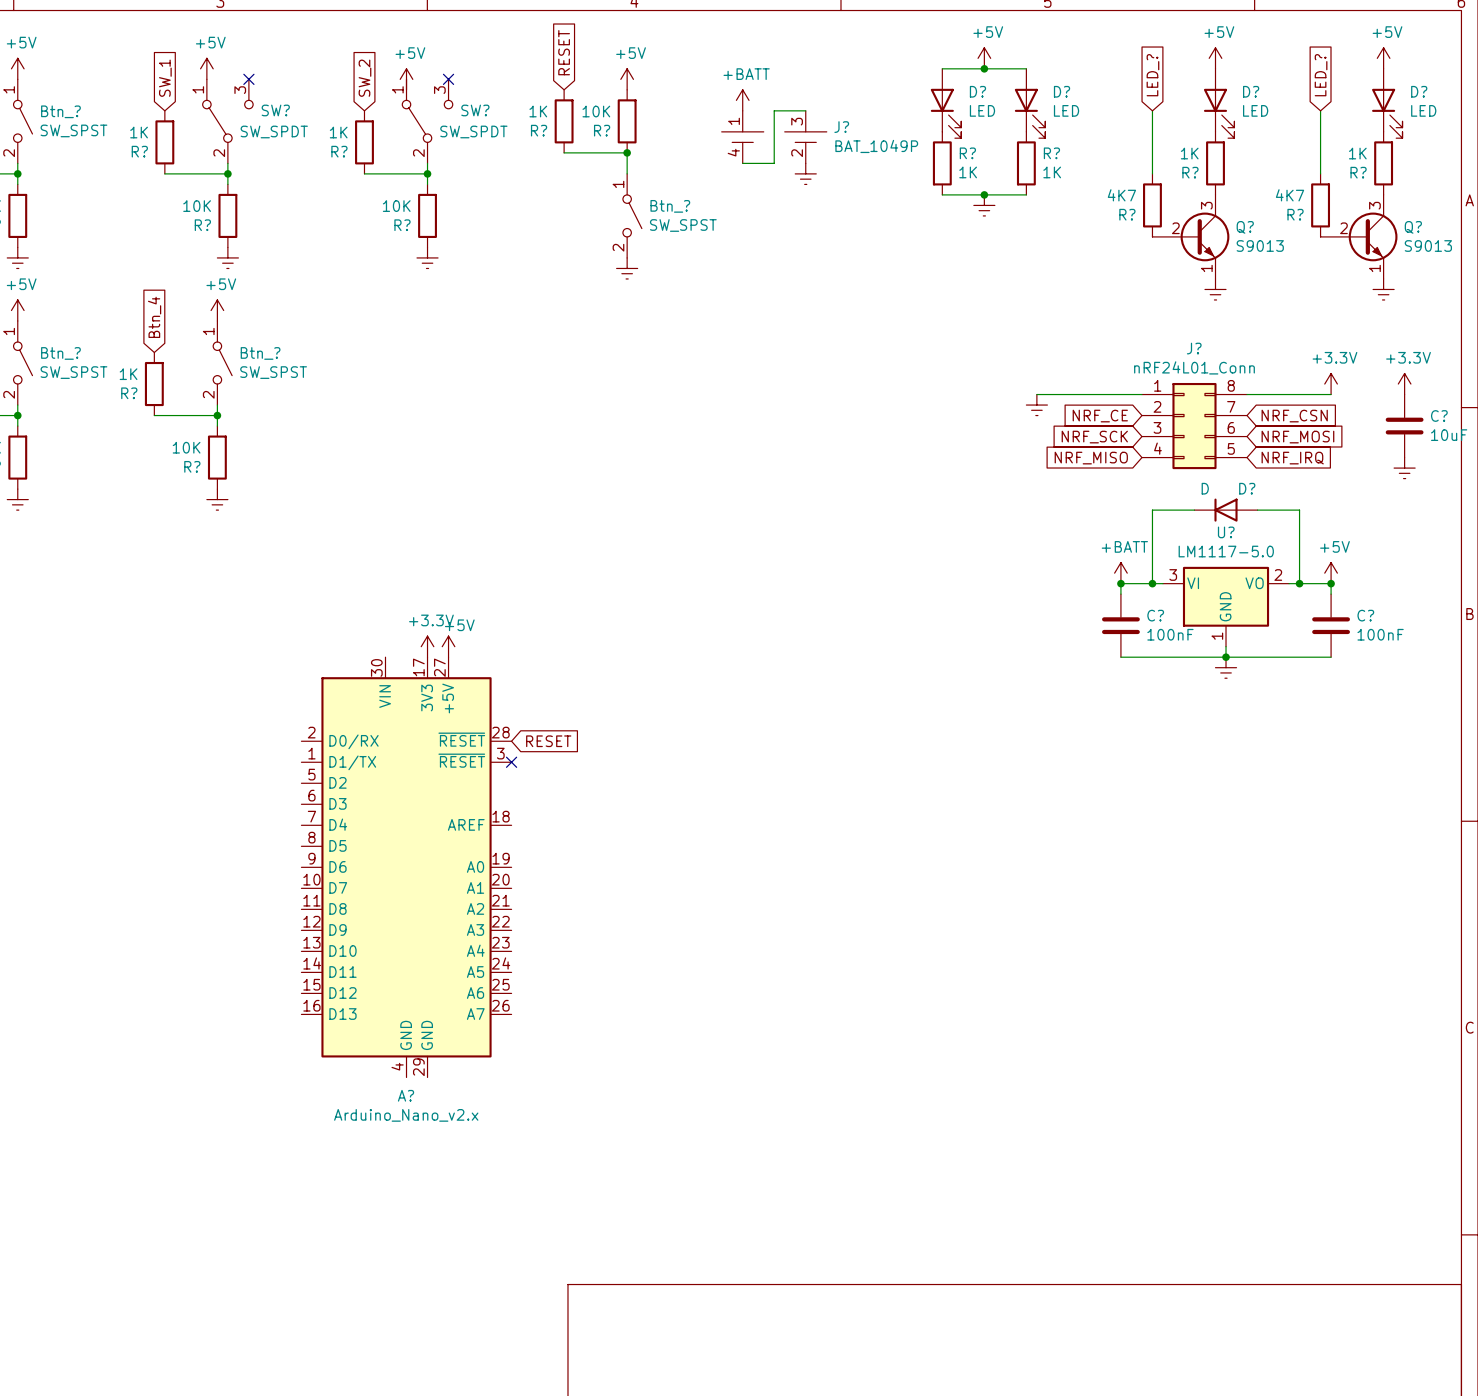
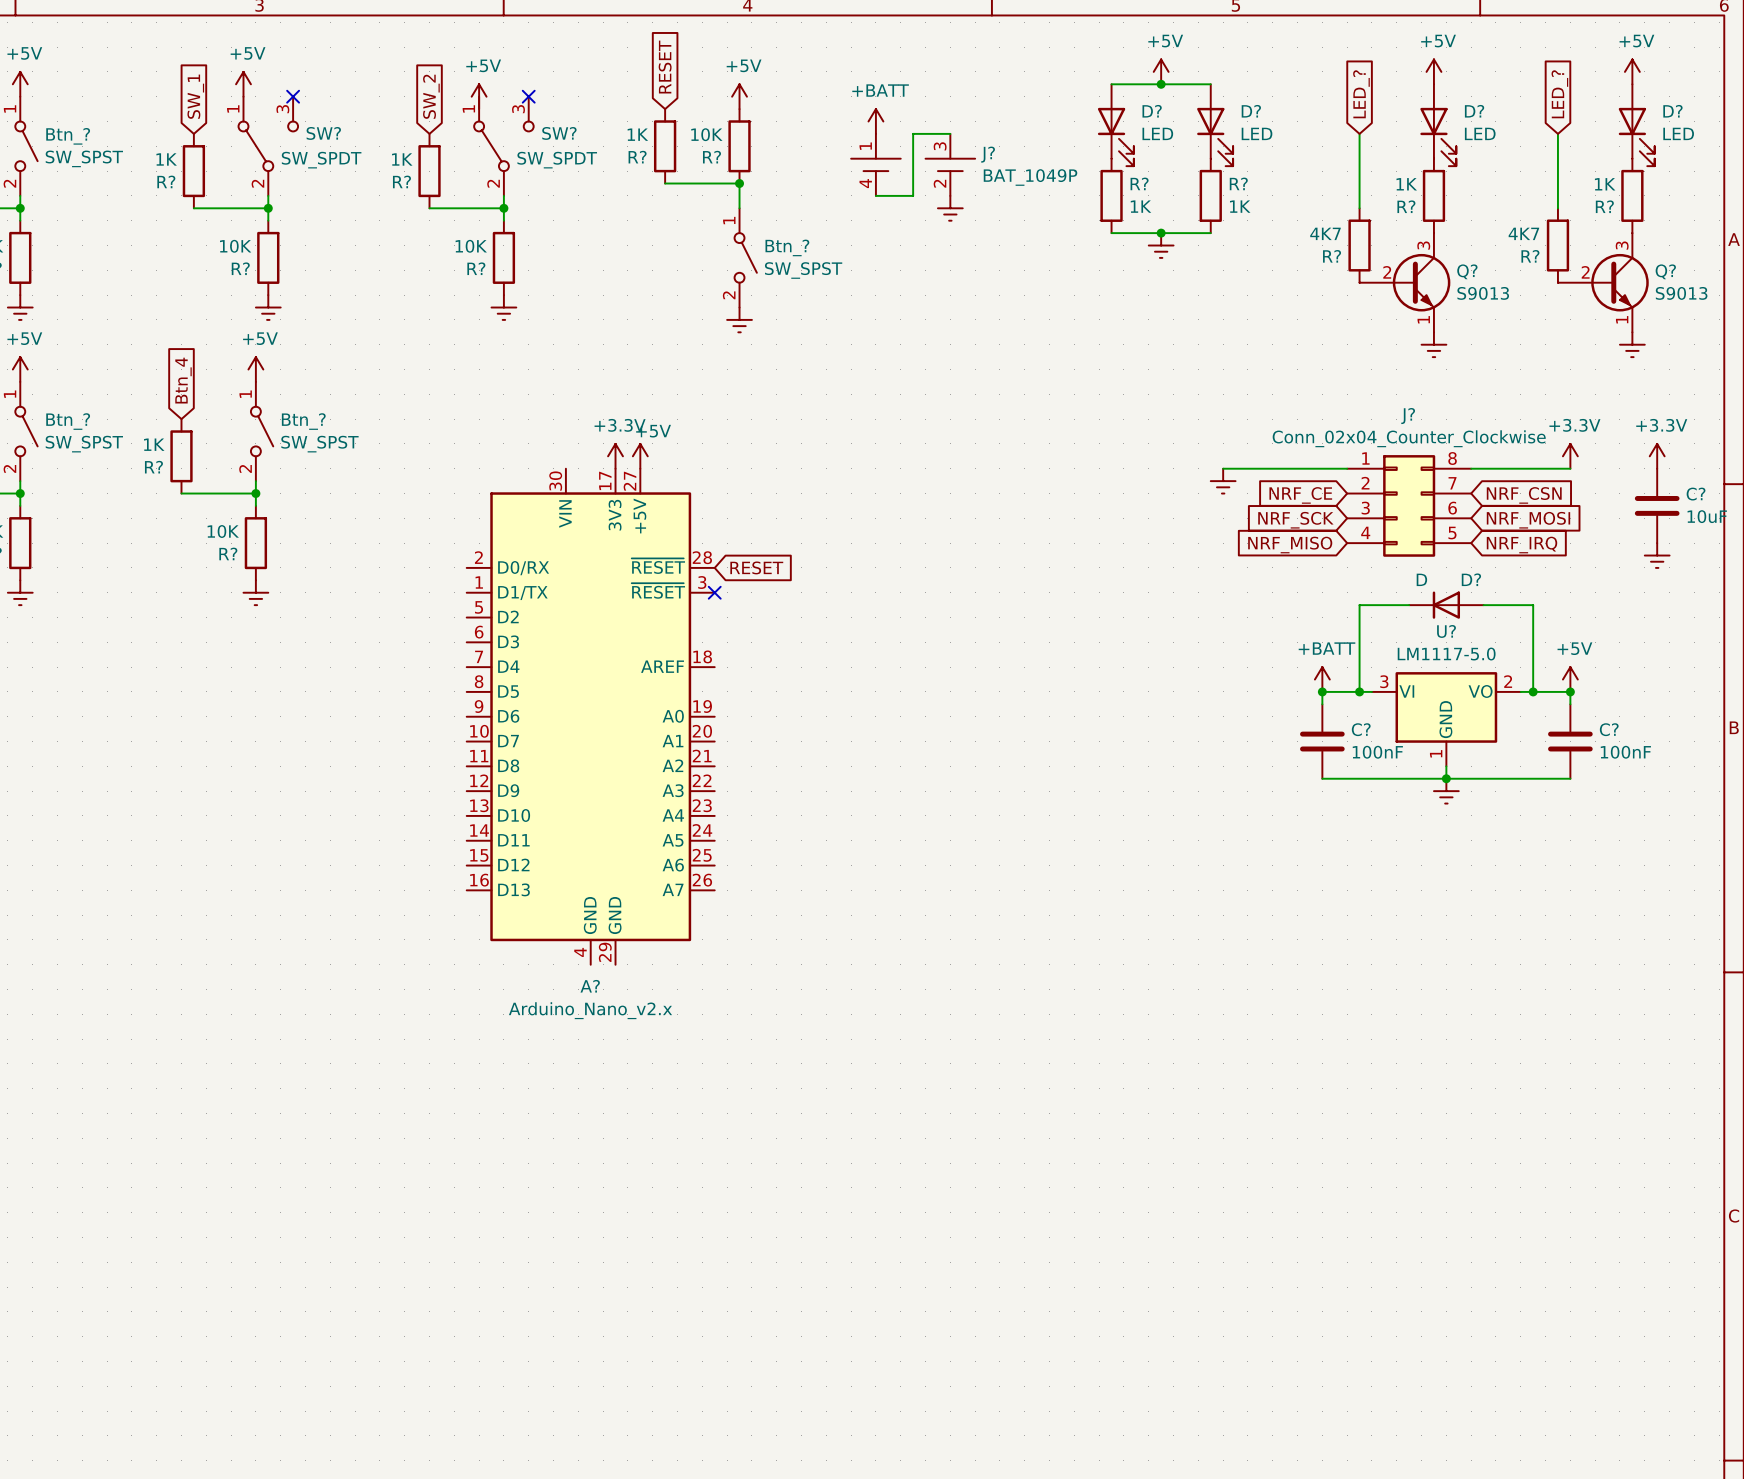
J? value: nRF24L01_Conn (1194, 367) -> Conn_02x04_Counter_Clockwise (1409, 438)
power symbol: none -> +3.3V (615, 456)
power symbol: none -> +5V (640, 456)
global label: none -> RESET (756, 567)
no-connect mark: none -> (714, 592)
A?: none -> Arduino_Nano_v2.x (590, 716)
power symbol: +3.3V (427, 646) -> none
power symbol: +5V (448, 646) -> none
global label: RESET (548, 741) -> none
no-connect mark: (511, 762) -> none
A?: Arduino_Nano_v2.x (406, 867) -> none

